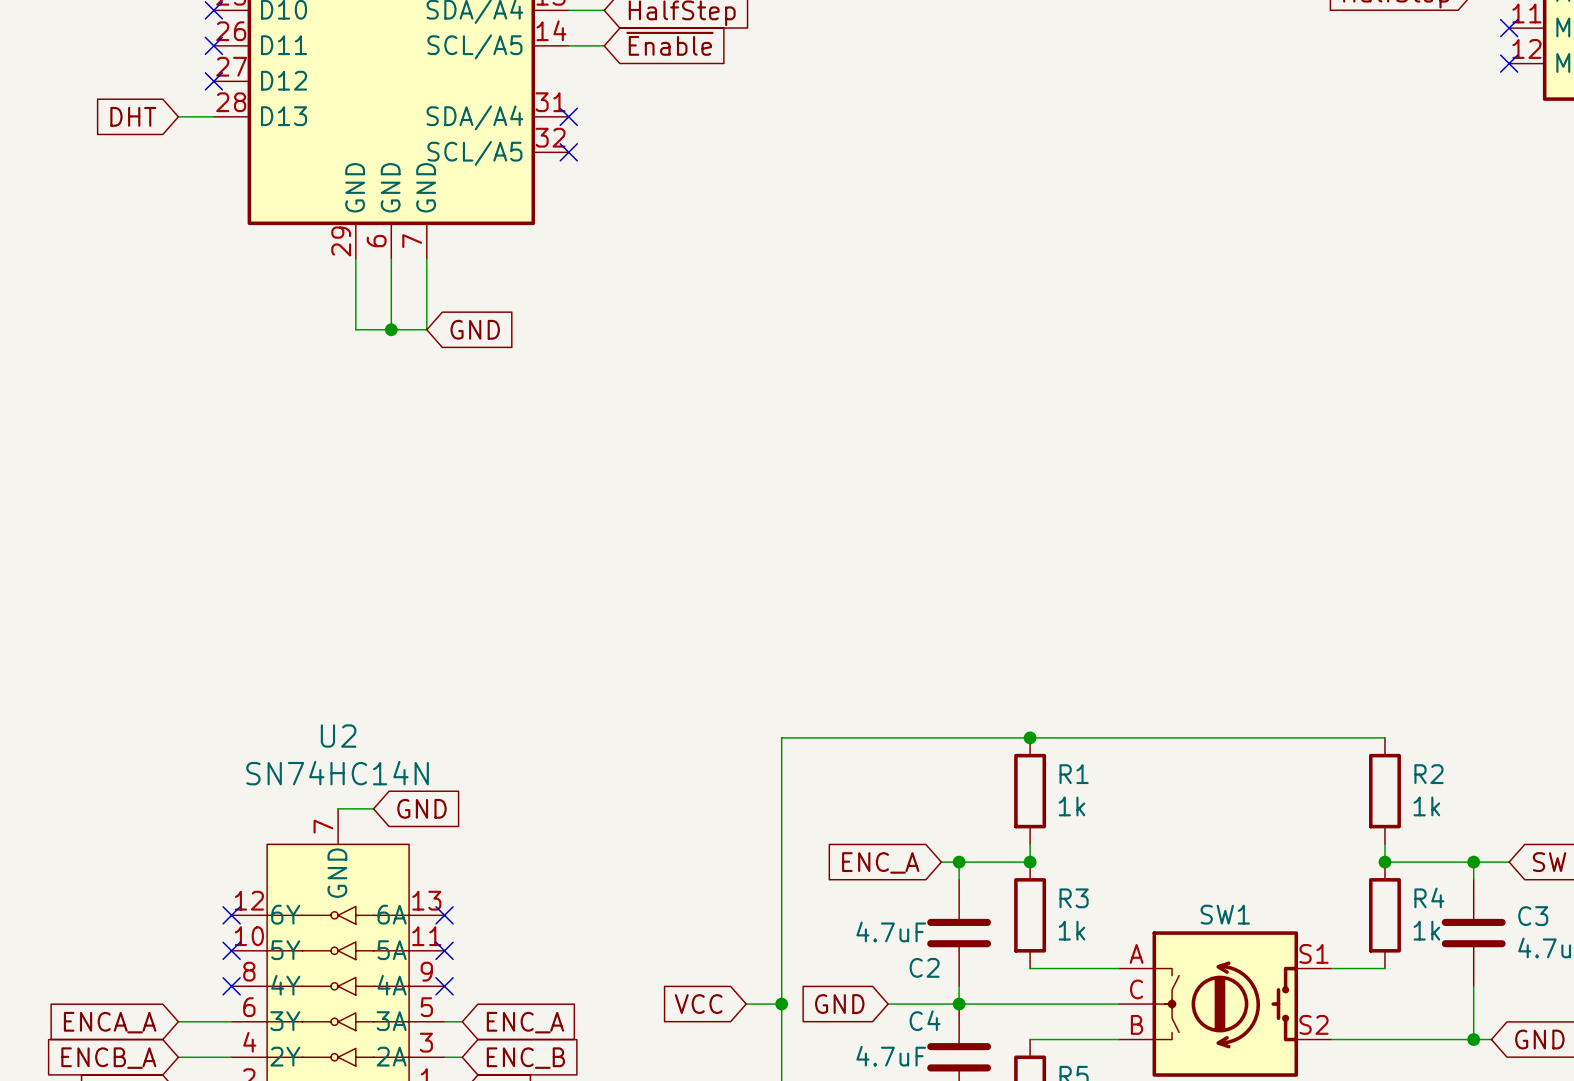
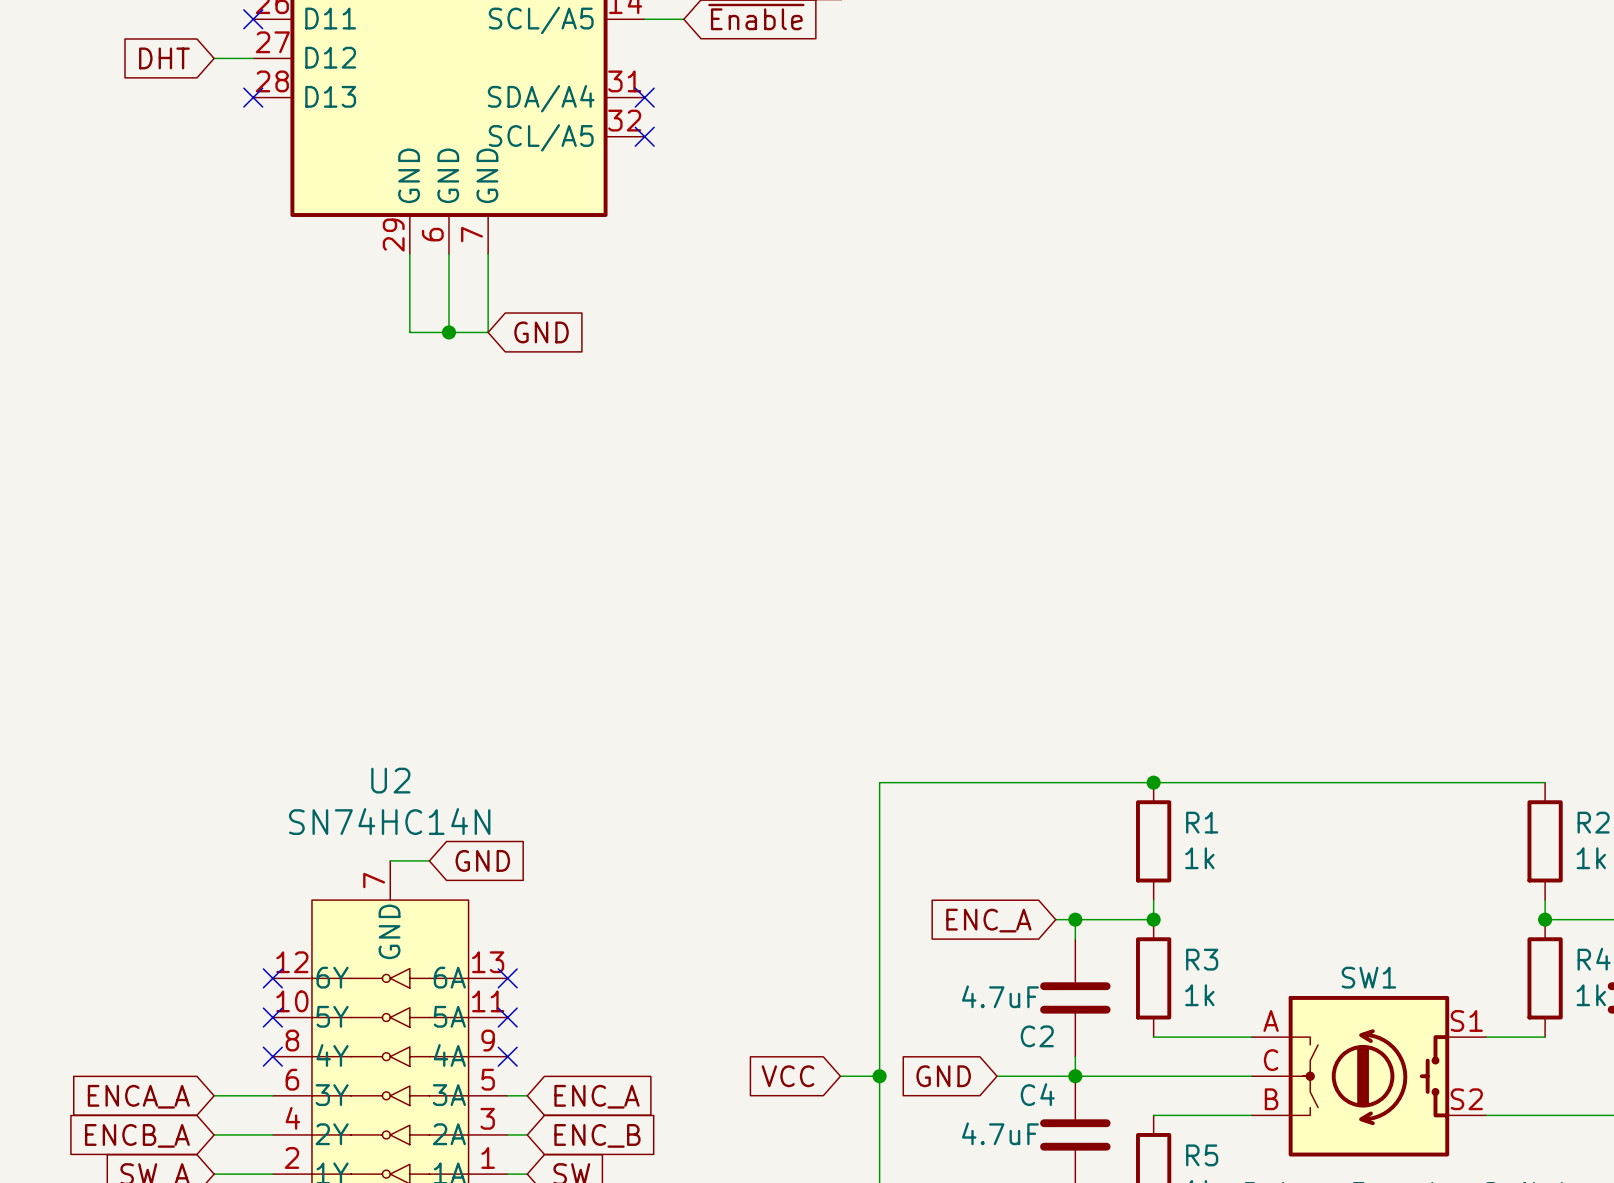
no-connect mark position: (213, 81) -> (253, 97)
global label position: DHT (133, 116) -> DHT (164, 58)
wire: (178, 116) (213, 116) -> (214, 58) (253, 58)

